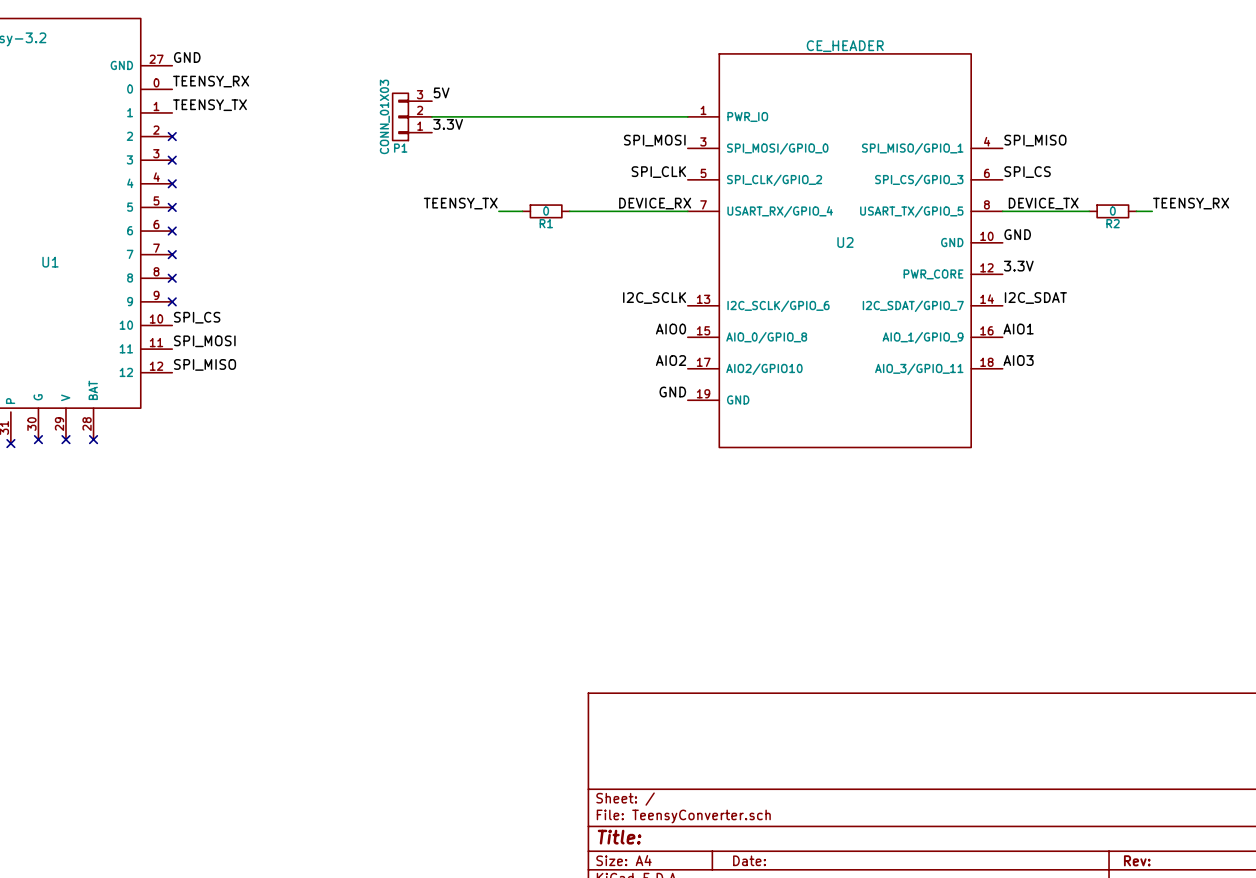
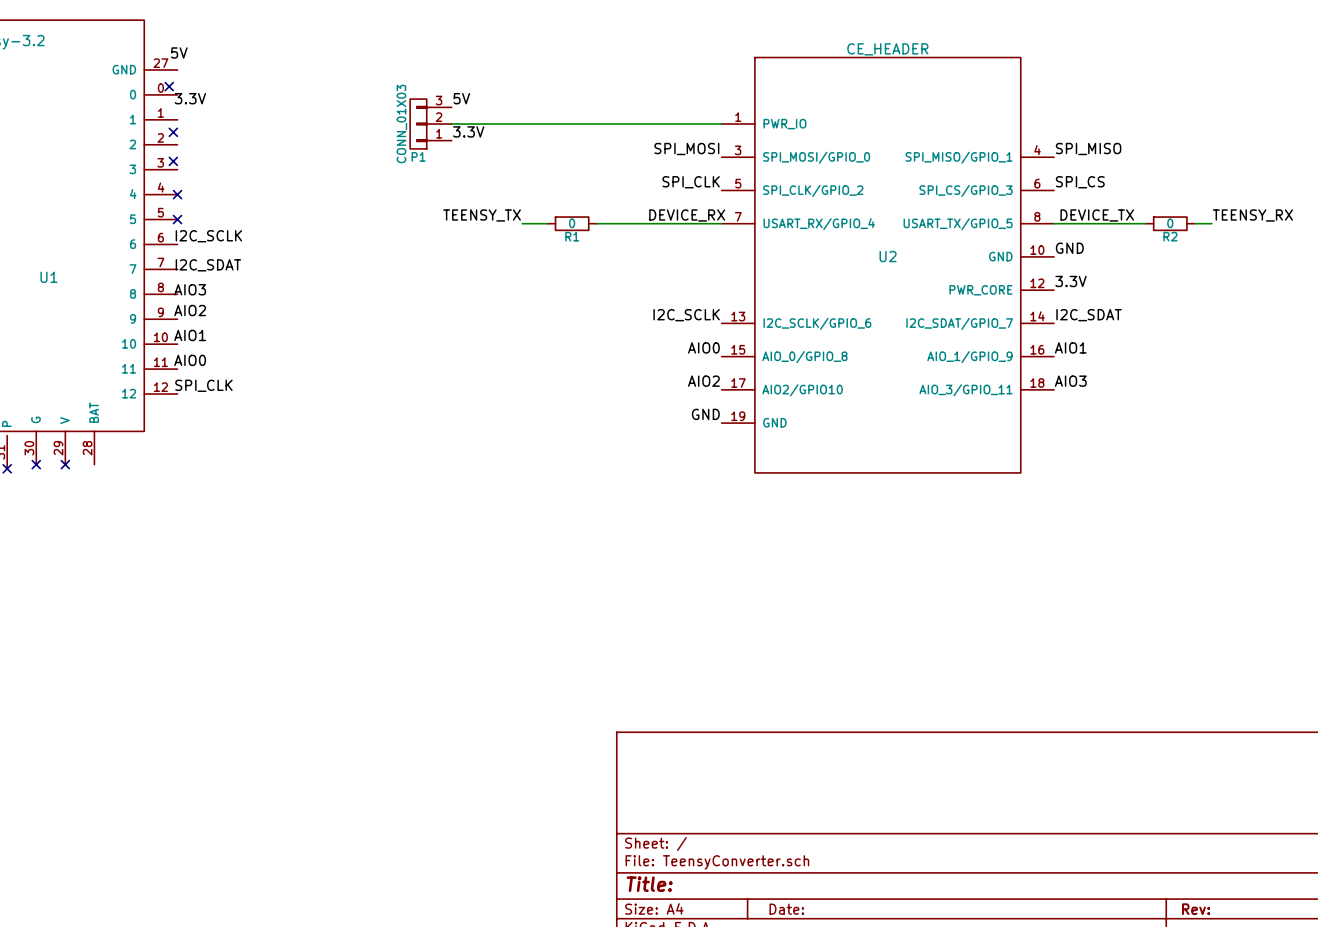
label: none -> 5V (179, 52)
label: GND (187, 57) -> none
no-connect mark: none -> (169, 86)
label: TEENSY_RX (211, 81) -> none
label: none -> 3.3V (190, 98)
label: TEENSY_TX (209, 105) -> none
no-connect mark: none -> (173, 132)
no-connect mark: (172, 136) -> none
no-connect mark: none -> (173, 161)
no-connect mark: (172, 160) -> none
label: none -> I2C_SCLK (208, 236)
no-connect mark: (172, 231) -> none
label: none -> I2C_SDAT (208, 265)
no-connect mark: (172, 254) -> none
label: none -> AIO3 (190, 289)
no-connect mark: (172, 278) -> none
label: none -> AIO2 (190, 310)
no-connect mark: (172, 301) -> none
label: SPI_CS (197, 317) -> AIO1 (190, 335)
label: SPI_MOSI (204, 341) -> AIO0 (190, 360)
label: SPI_MISO (205, 364) -> SPI_CLK (203, 385)
no-connect mark: (93, 439) -> none

